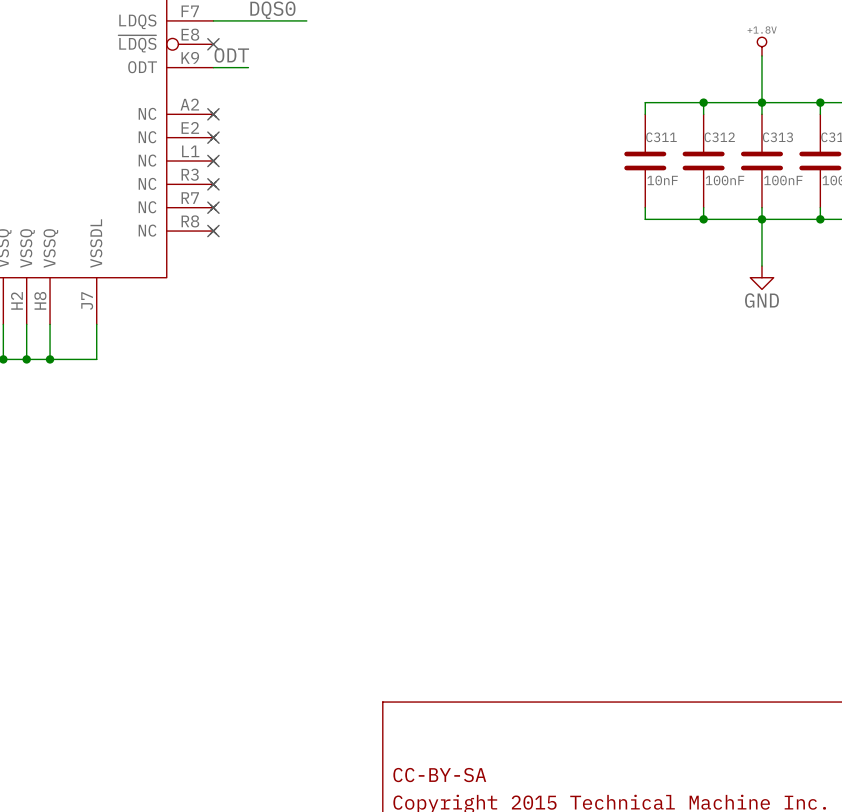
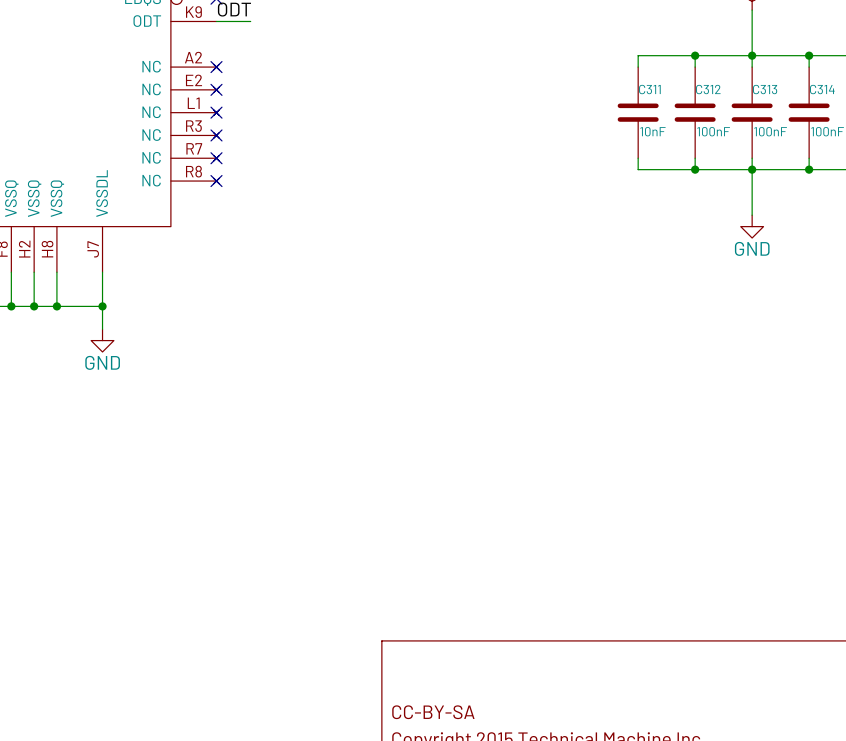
wire: none -> (102, 306) (102, 329)
junction: none -> (102, 306)
power symbol: none -> GND (102, 340)

